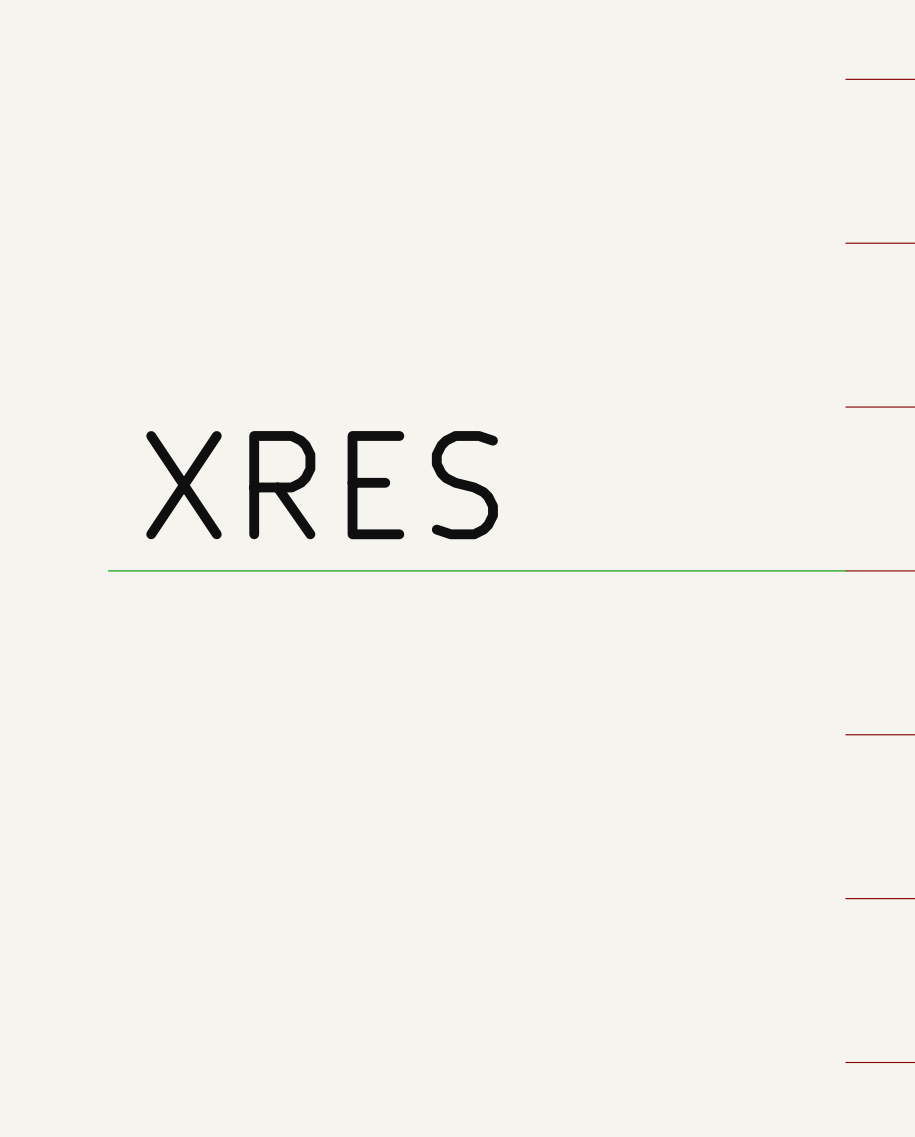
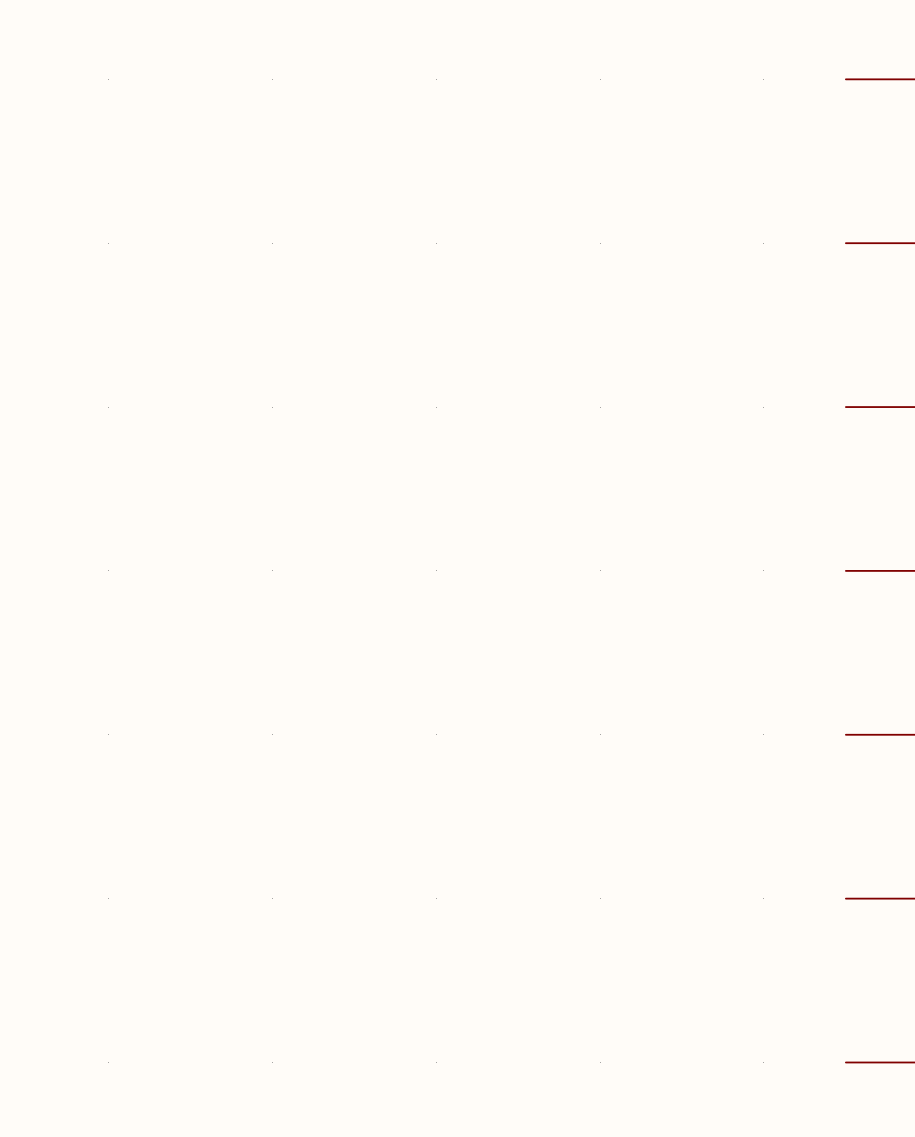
label: XRES (322, 485) -> none
wire: (108, 570) (845, 570) -> none

